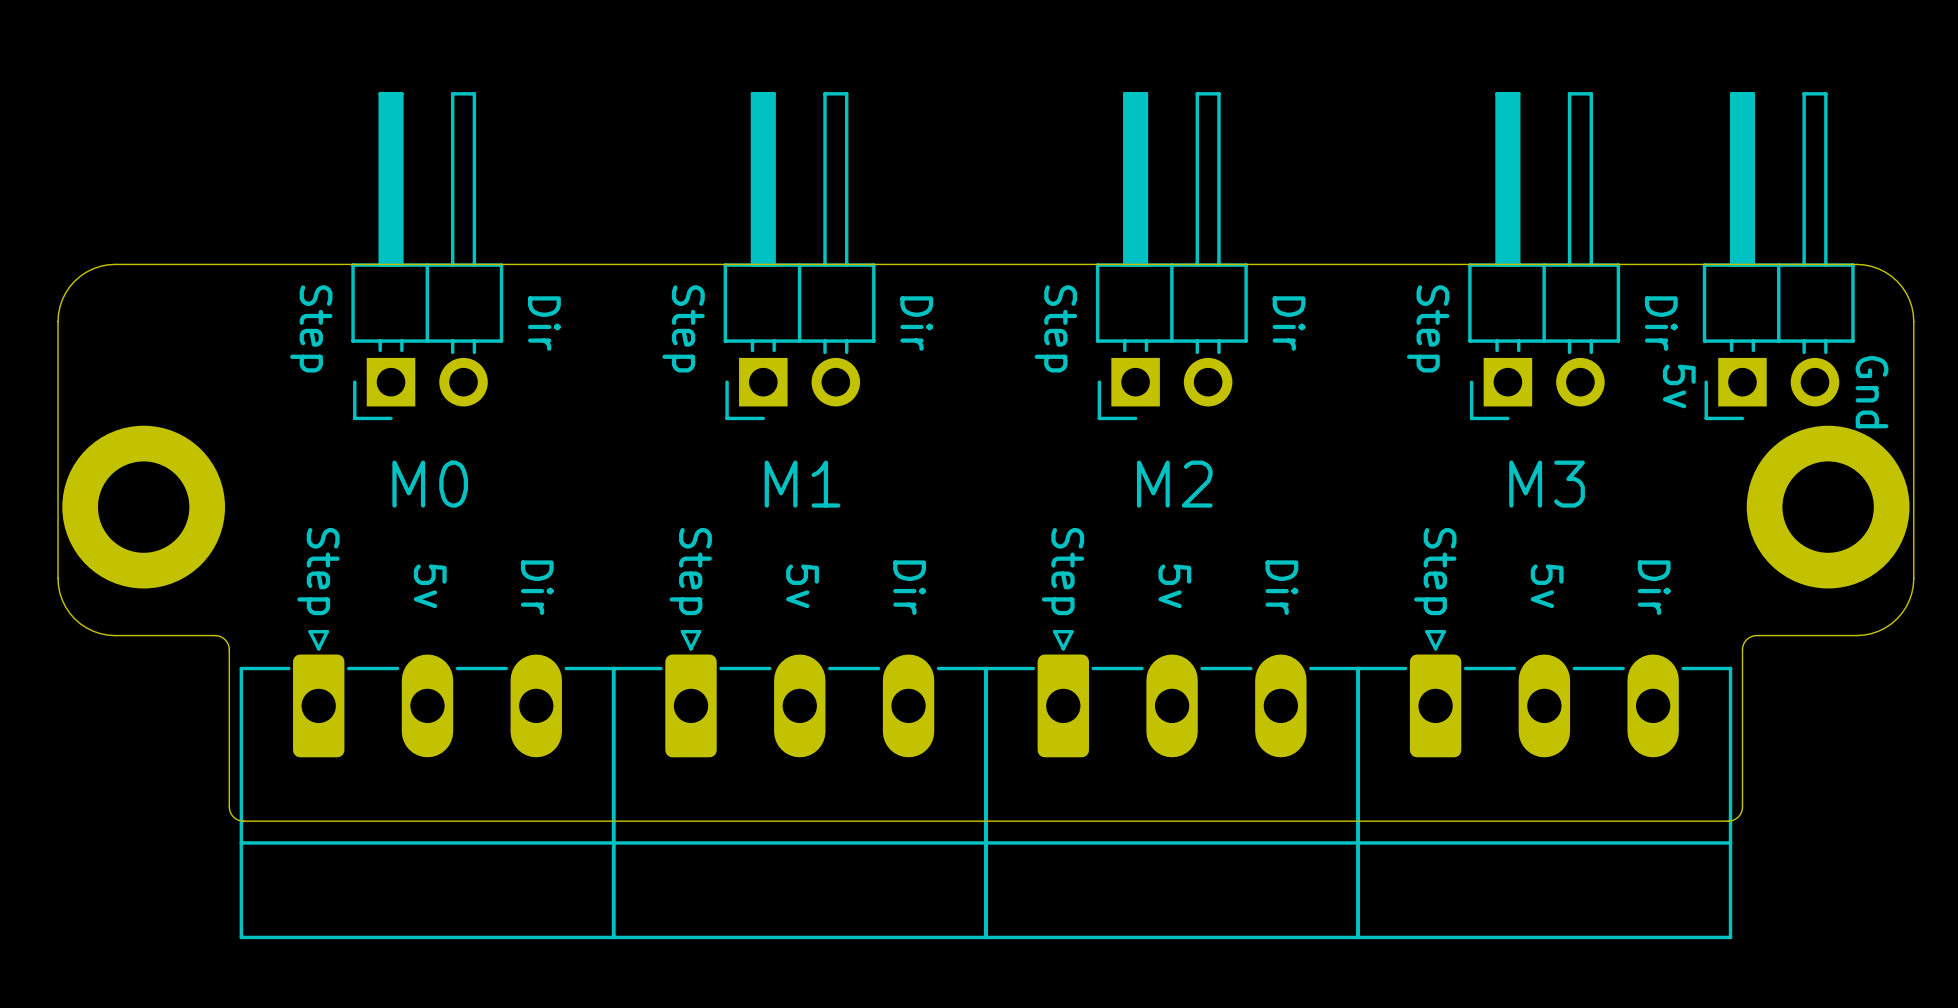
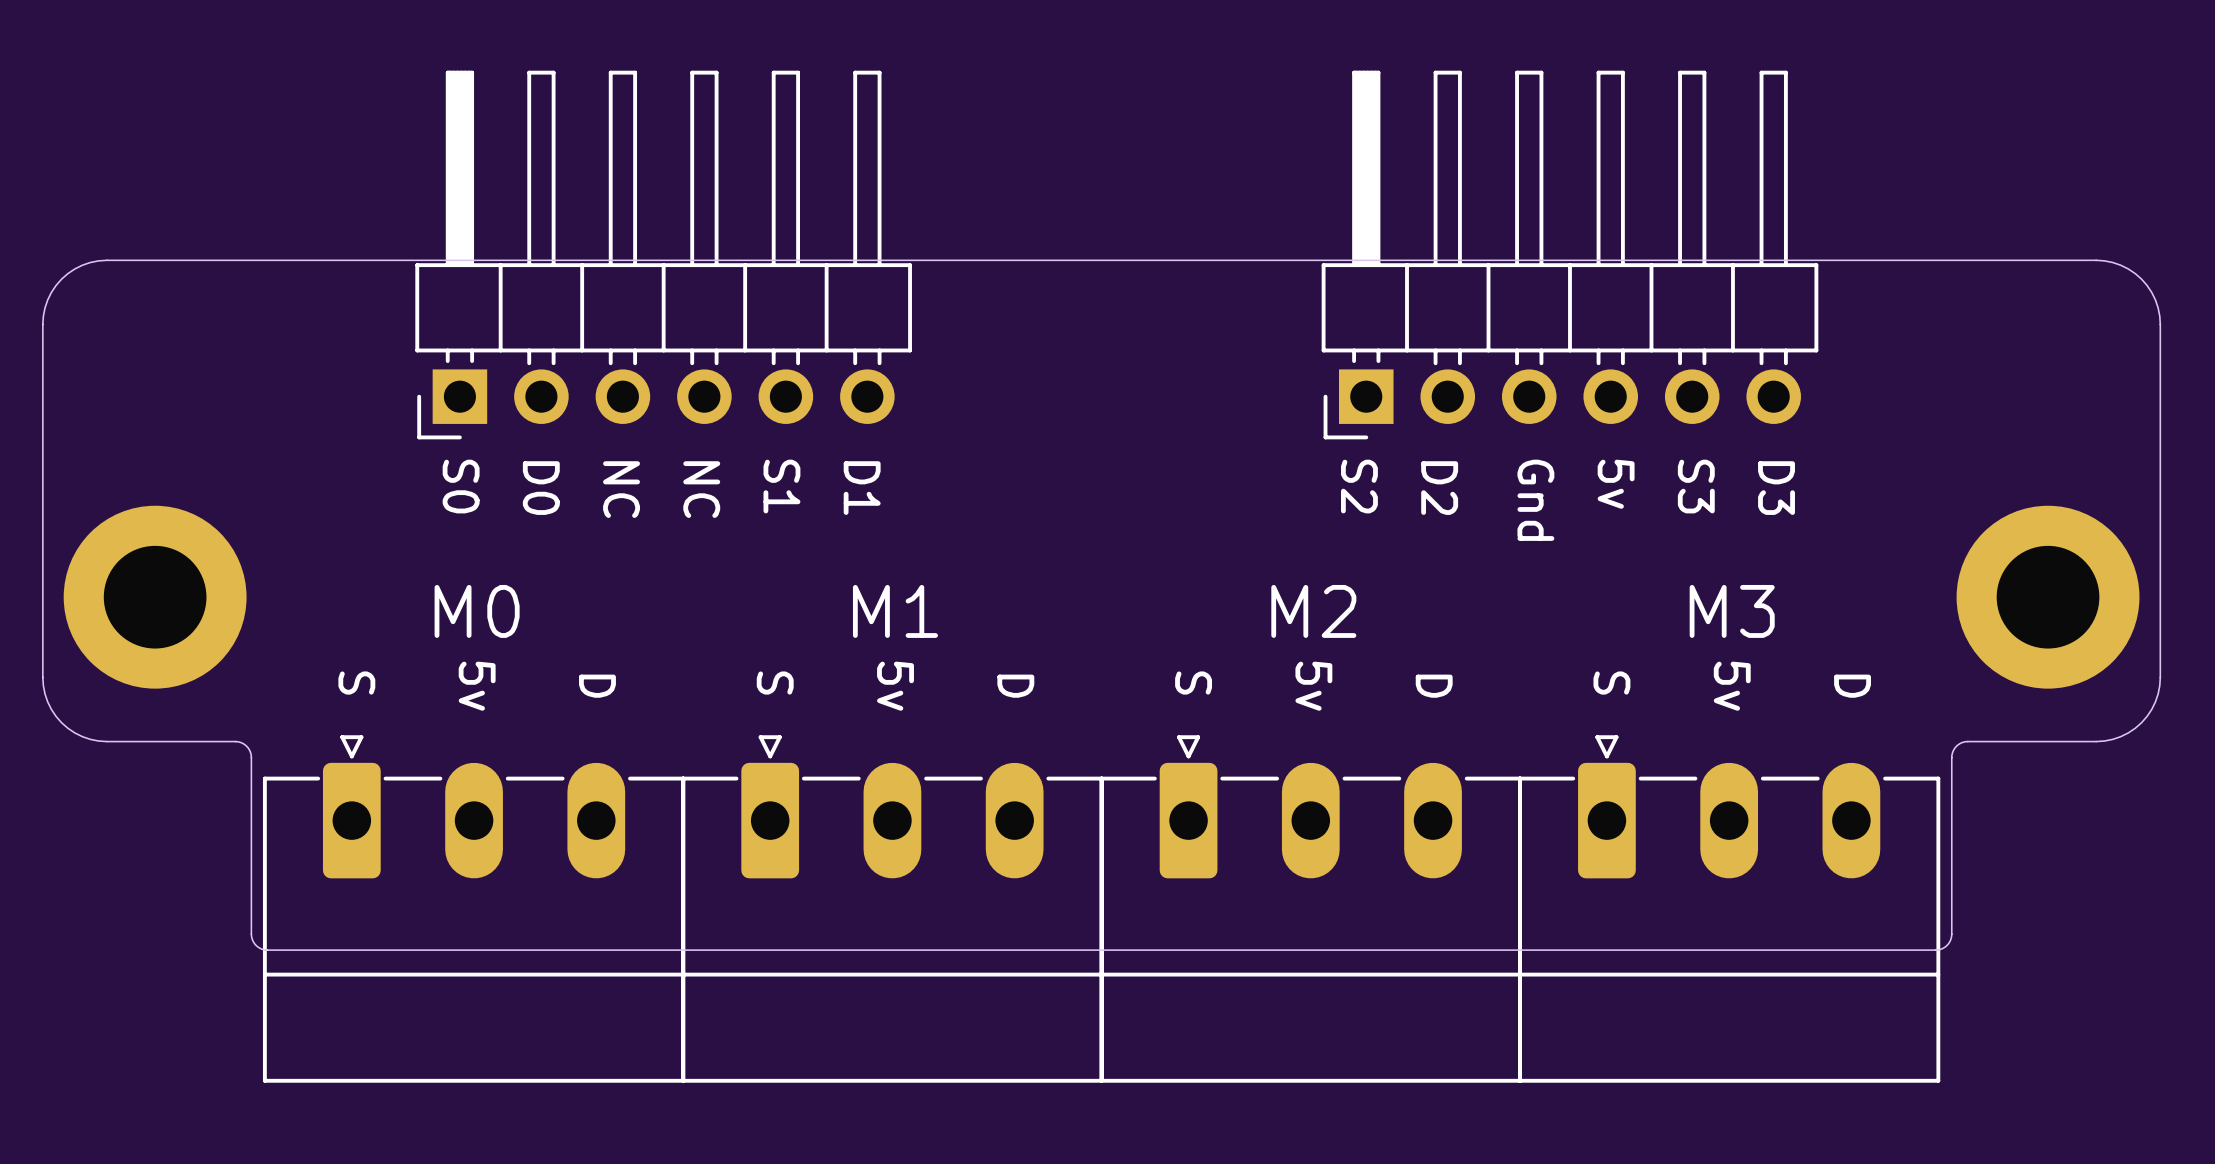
part: none -> (663, 255)
part: none -> (1569, 255)
part: (427, 256) -> none
part: (799, 256) -> none
part: (1171, 256) -> none
part: (1544, 256) -> none
part: (1778, 256) -> none
text: Dir (544, 323) -> none
text: Dir (916, 323) -> none
text: Dir (1289, 323) -> none
text: Dir (1661, 323) -> none
text: Step (311, 328) -> none
text: Step (683, 328) -> S1 (781, 486)
text: Step (1055, 328) -> none
text: Step (1428, 328) -> none
text position: 5v (1679, 386) -> 5v (1616, 484)
text position: Gnd (1872, 392) -> Gnd (1535, 500)
text: none -> S0 (461, 486)
text: none -> S2 (1359, 486)
text: none -> S3 (1696, 486)
text: none -> D0 (541, 488)
text: none -> D1 (862, 488)
text: none -> D2 (1439, 488)
text: none -> D3 (1776, 488)
text: none -> NC (621, 489)
text: none -> NC (701, 489)
text position: M0 (430, 484) -> M0 (477, 611)
text position: M1 (802, 484) -> M1 (895, 611)
text position: M2 (1174, 484) -> M2 (1313, 611)
text position: M3 (1547, 484) -> M3 (1732, 611)
text: Step (318, 571) -> S (356, 683)
text: Step (690, 571) -> S (775, 683)
text: Step (1063, 571) -> S (1193, 683)
text: Step (1435, 571) -> S (1611, 683)
text: Dir (537, 587) -> D (597, 686)
text: Dir (909, 587) -> D (1015, 686)
text: Dir (1281, 587) -> D (1434, 686)
text: Dir (1654, 587) -> D (1852, 686)
board edge: (115, 635) (93, 631) (74, 618) (62, 600) (58, 578) (58, 314) (65, 292) (80, 276) (93, 268) (115, 264) (1856, 264) (1871, 266) (1885, 272) (1897, 281) (1909, 299) (1913, 314) (1913, 578) (1909, 600) (1897, 618) (1878, 631) (1856, 635) -> (123, 741) (90, 739) (67, 728) (51, 709) (45, 694) (42, 677) (43, 316) (51, 292) (67, 273) (82, 265) (107, 260) (2096, 260) (2112, 262) (2128, 268) (2141, 279) (2155, 299) (2159, 316) (2159, 685) (2151, 709) (2135, 728) (2112, 739) (2080, 741)

